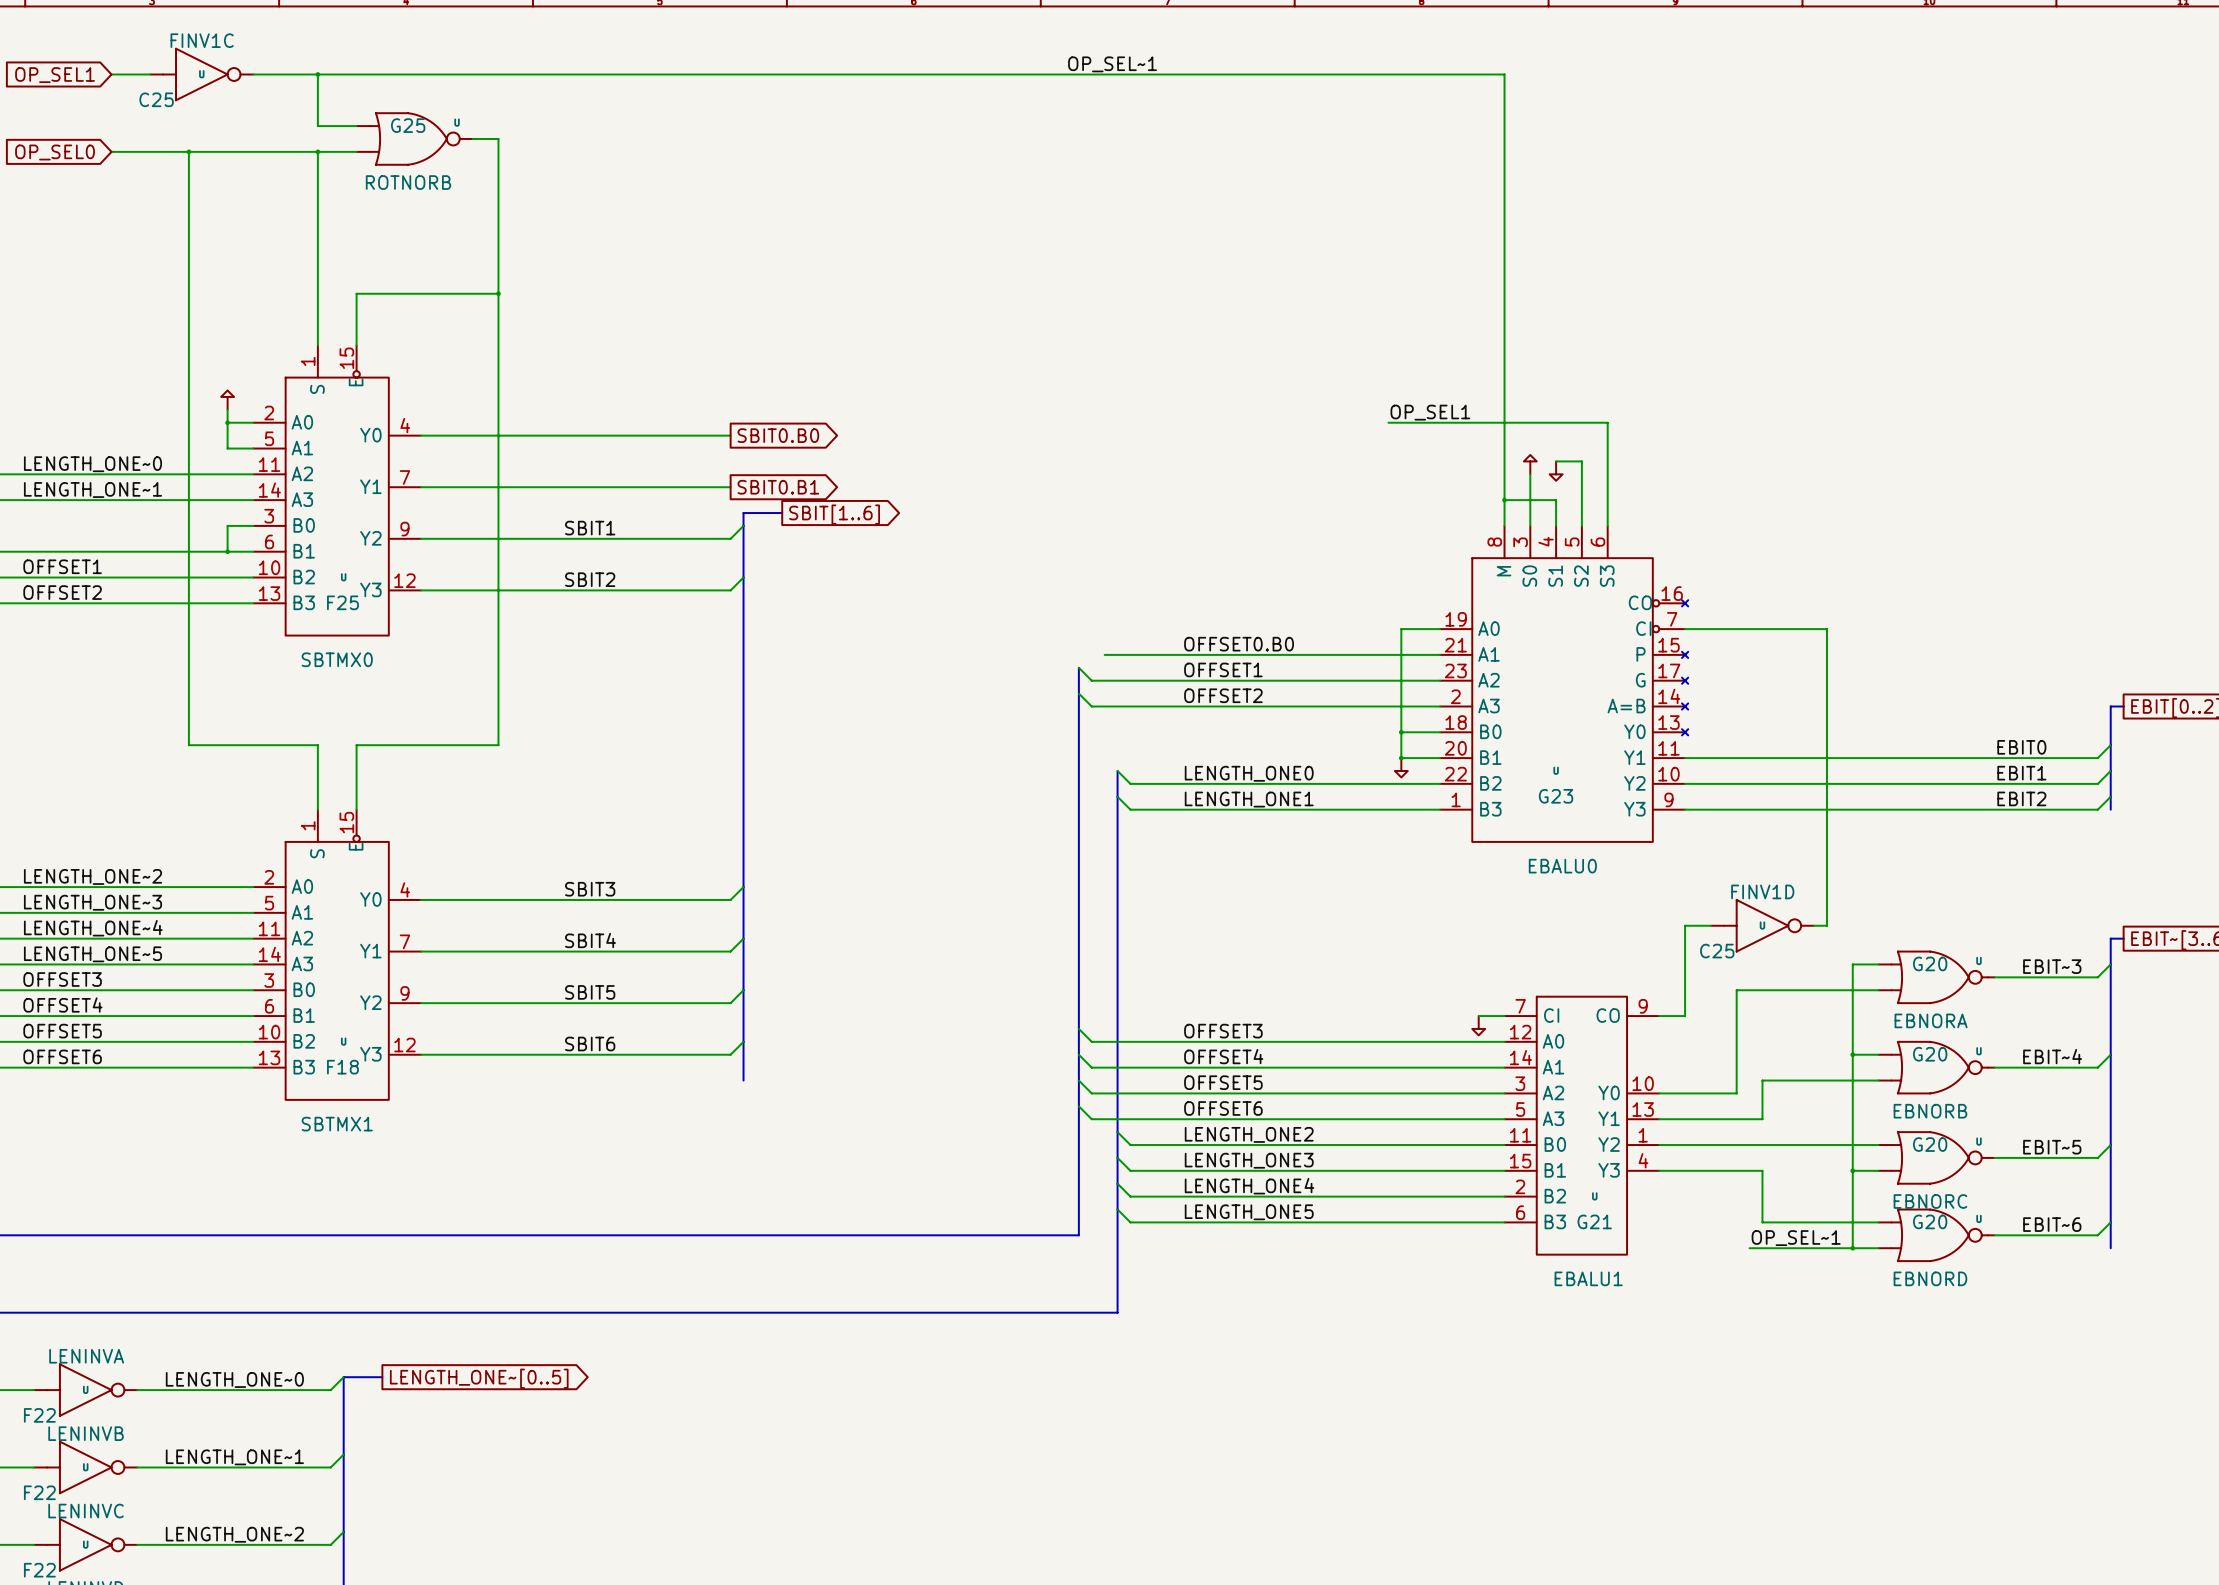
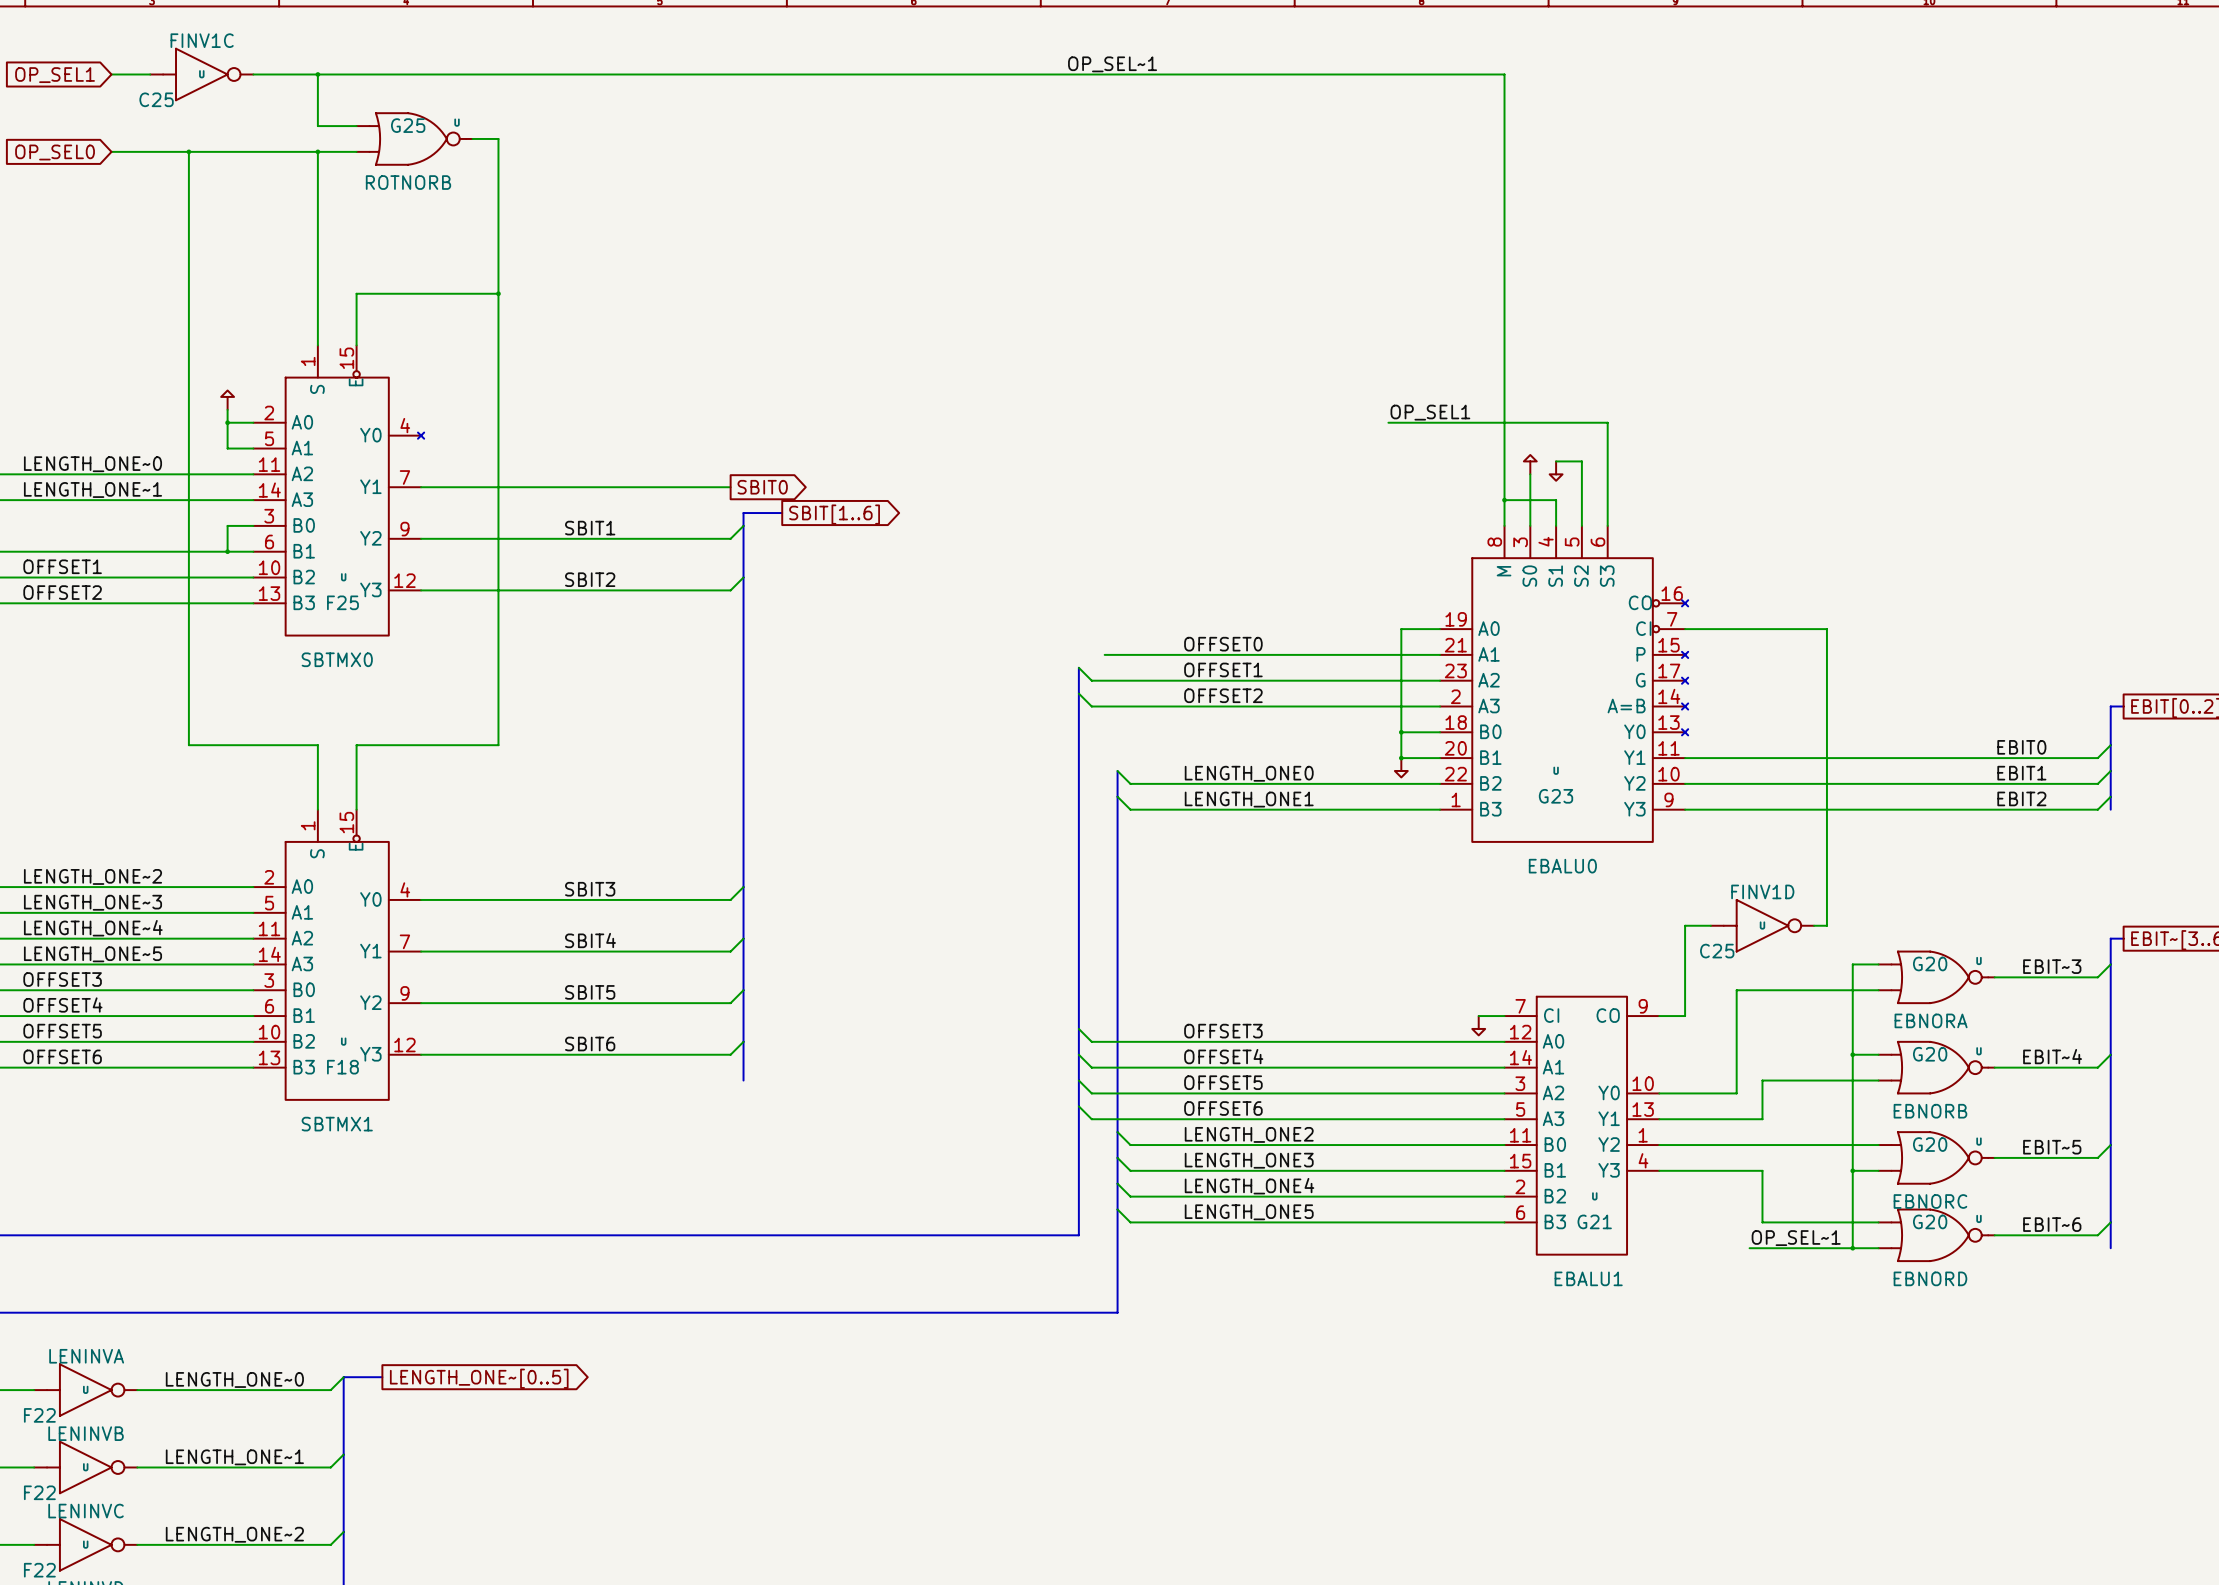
wire: (421, 435) (730, 435) -> none
no-connect mark: none -> (421, 435)
global label: SBIT0.B0 (778, 435) -> none
global label: SBIT0.B1 (778, 487) -> SBIT0 (762, 487)
label: OFFSET0.B0 (1239, 644) -> OFFSET0 (1223, 644)

